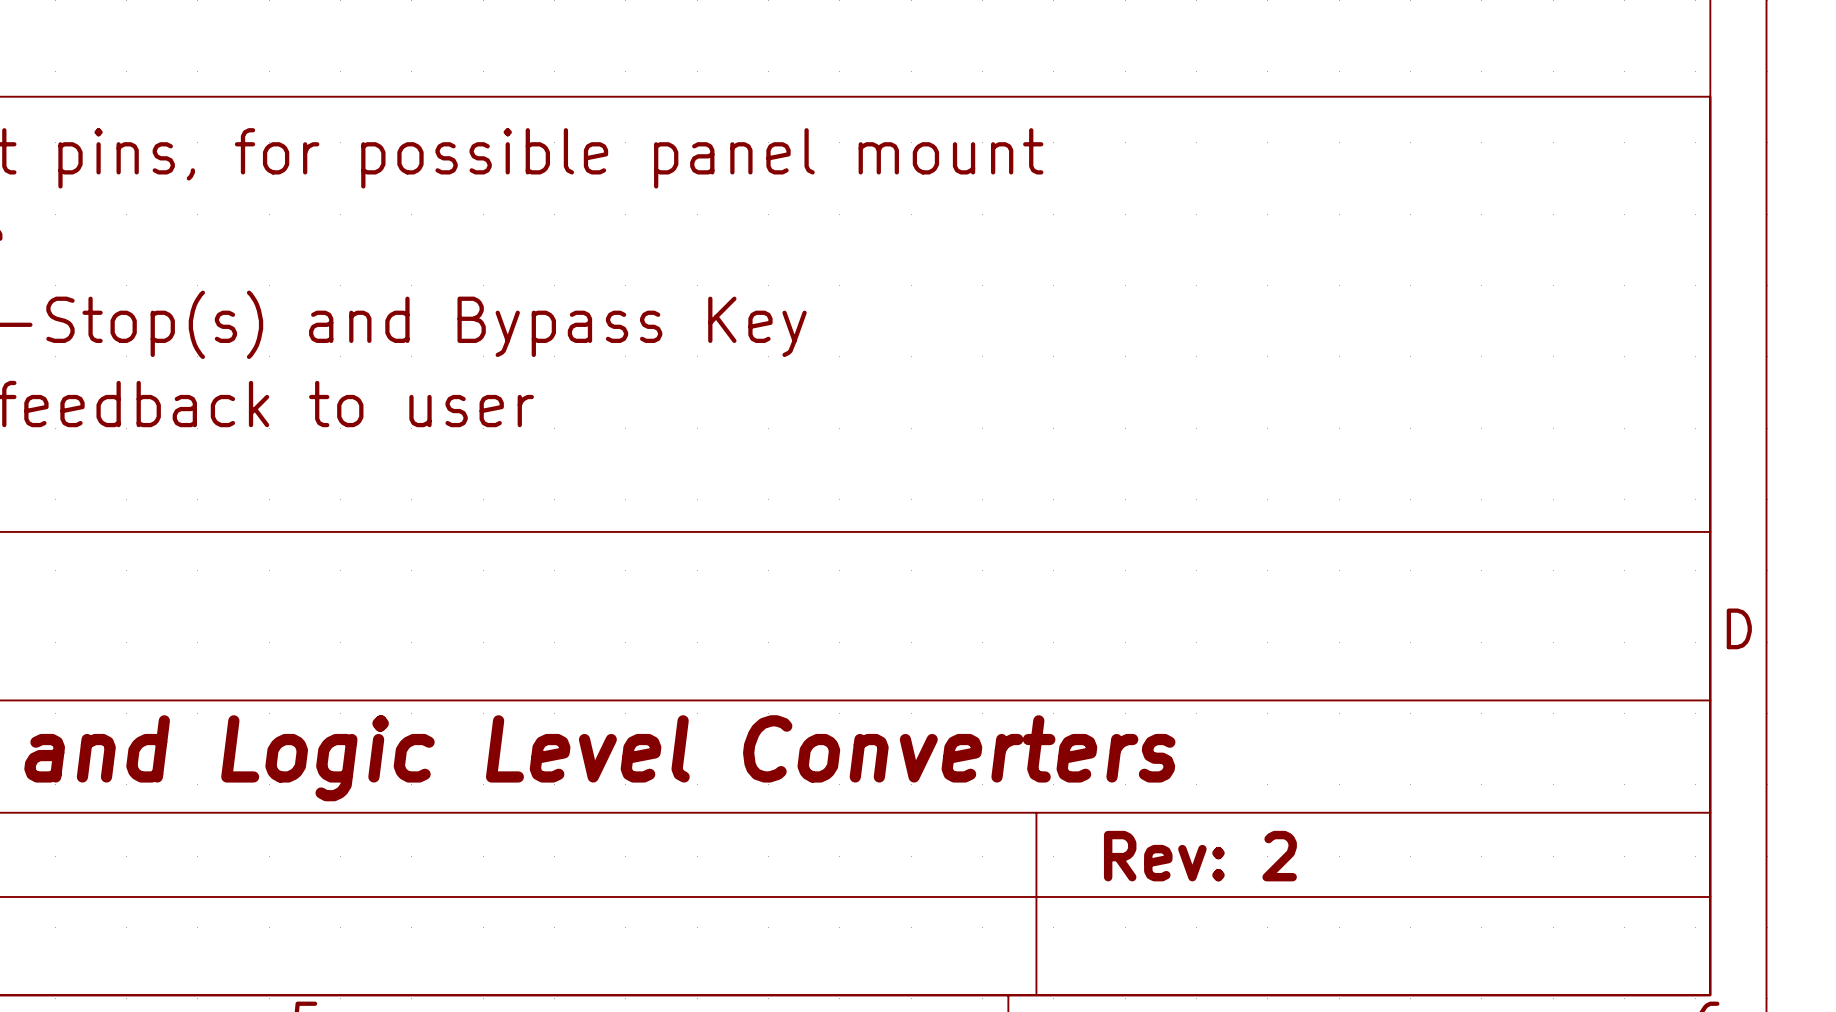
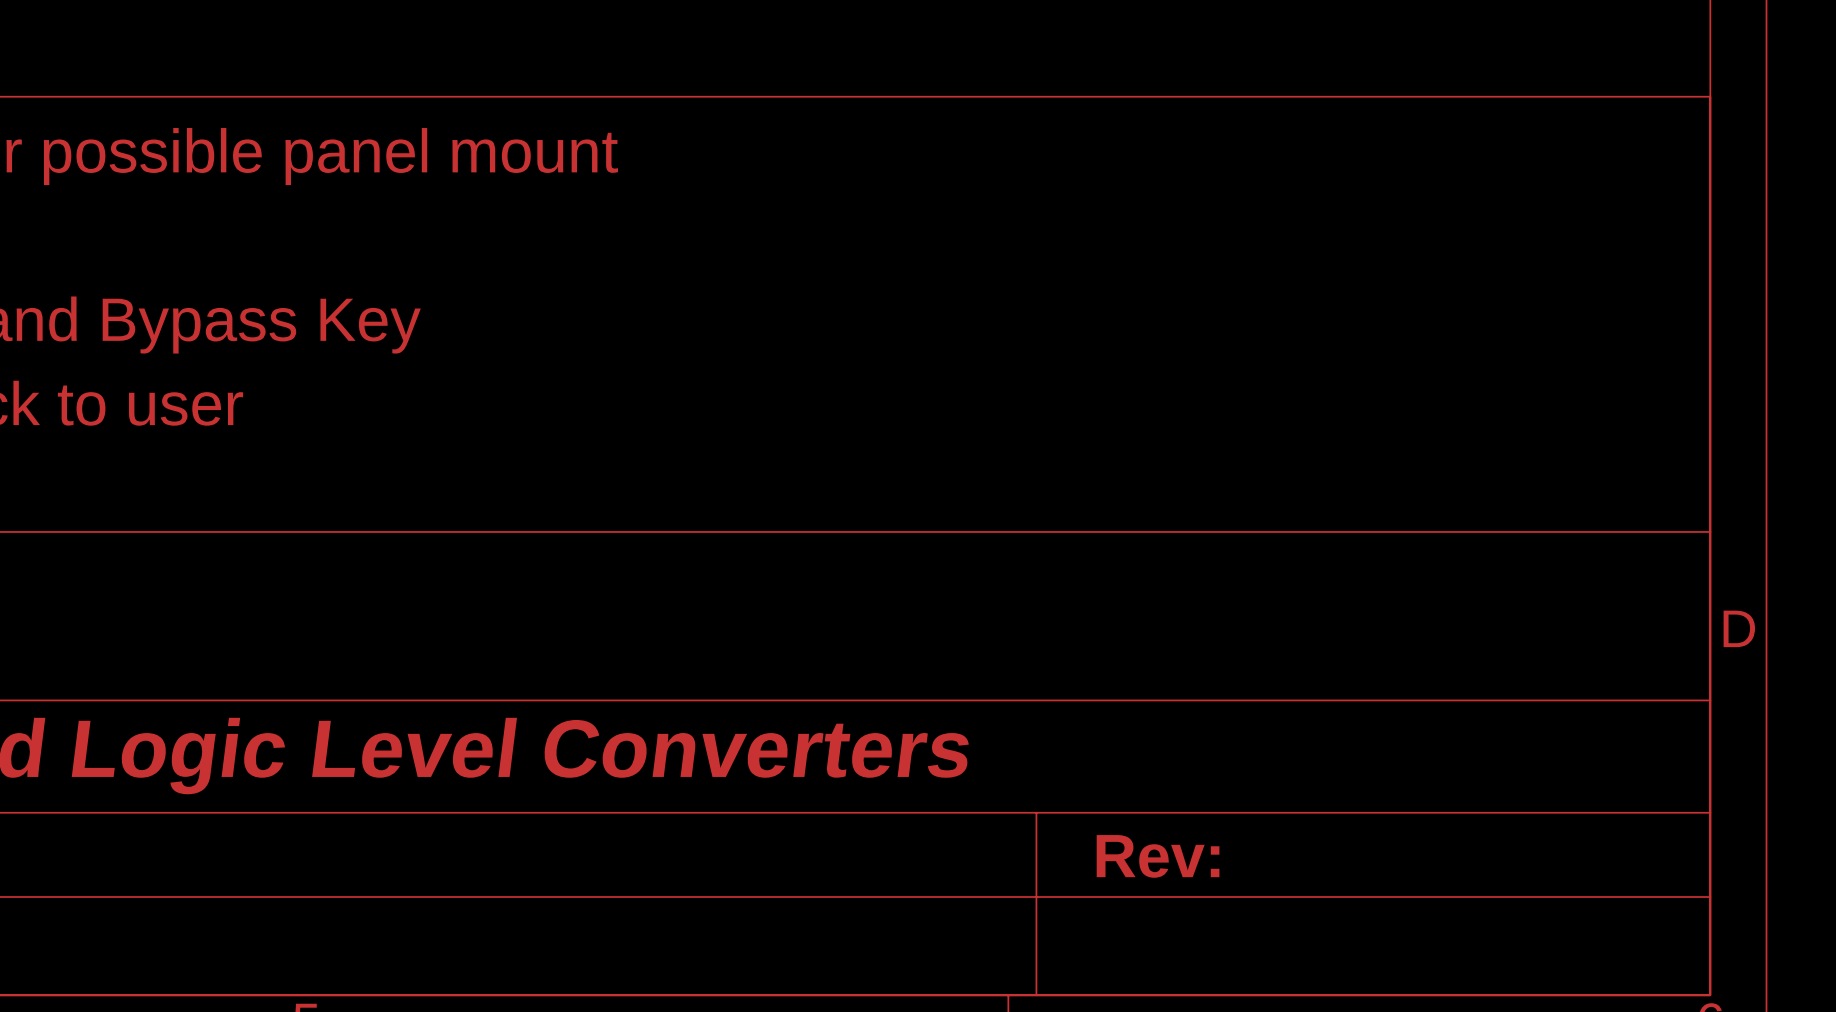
title block: Rev: 2 (1200, 856) -> Rev: (1158, 856)

